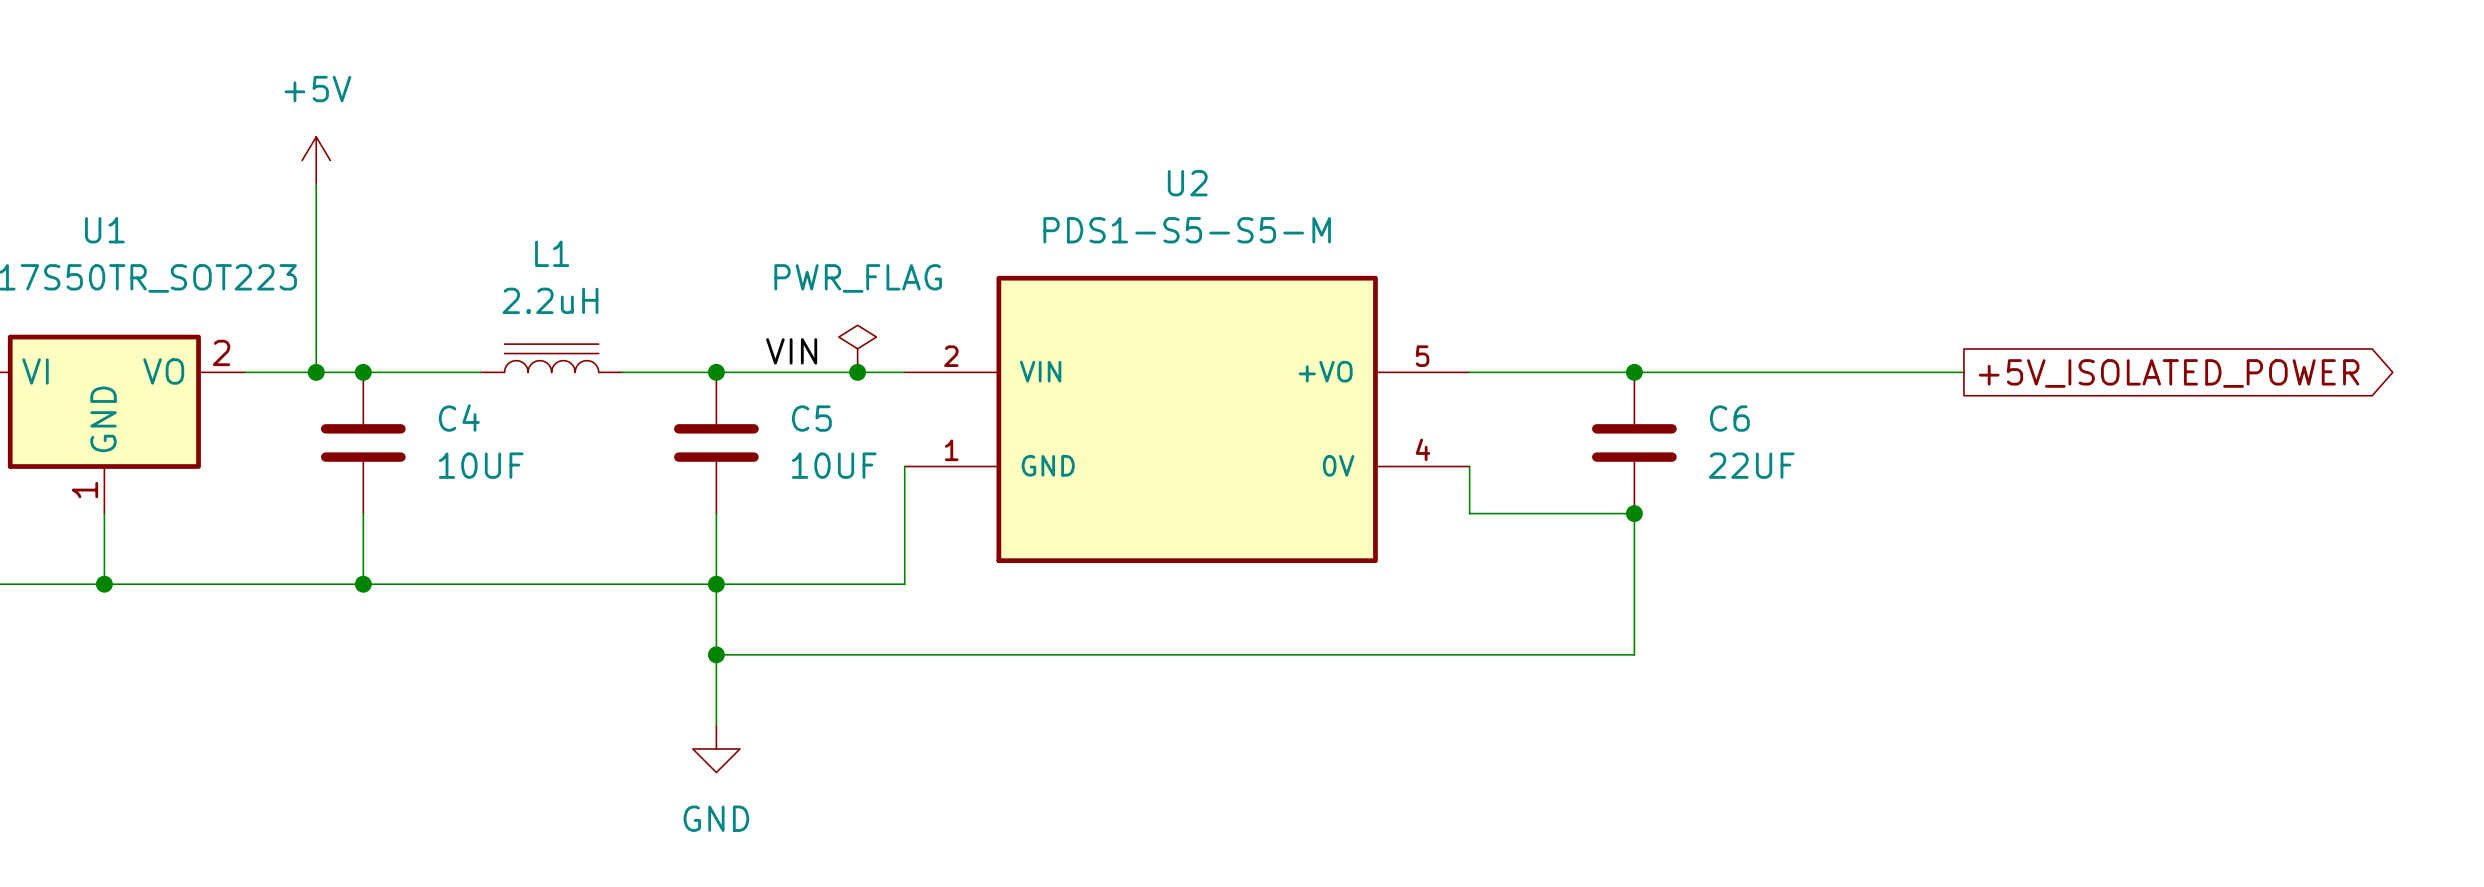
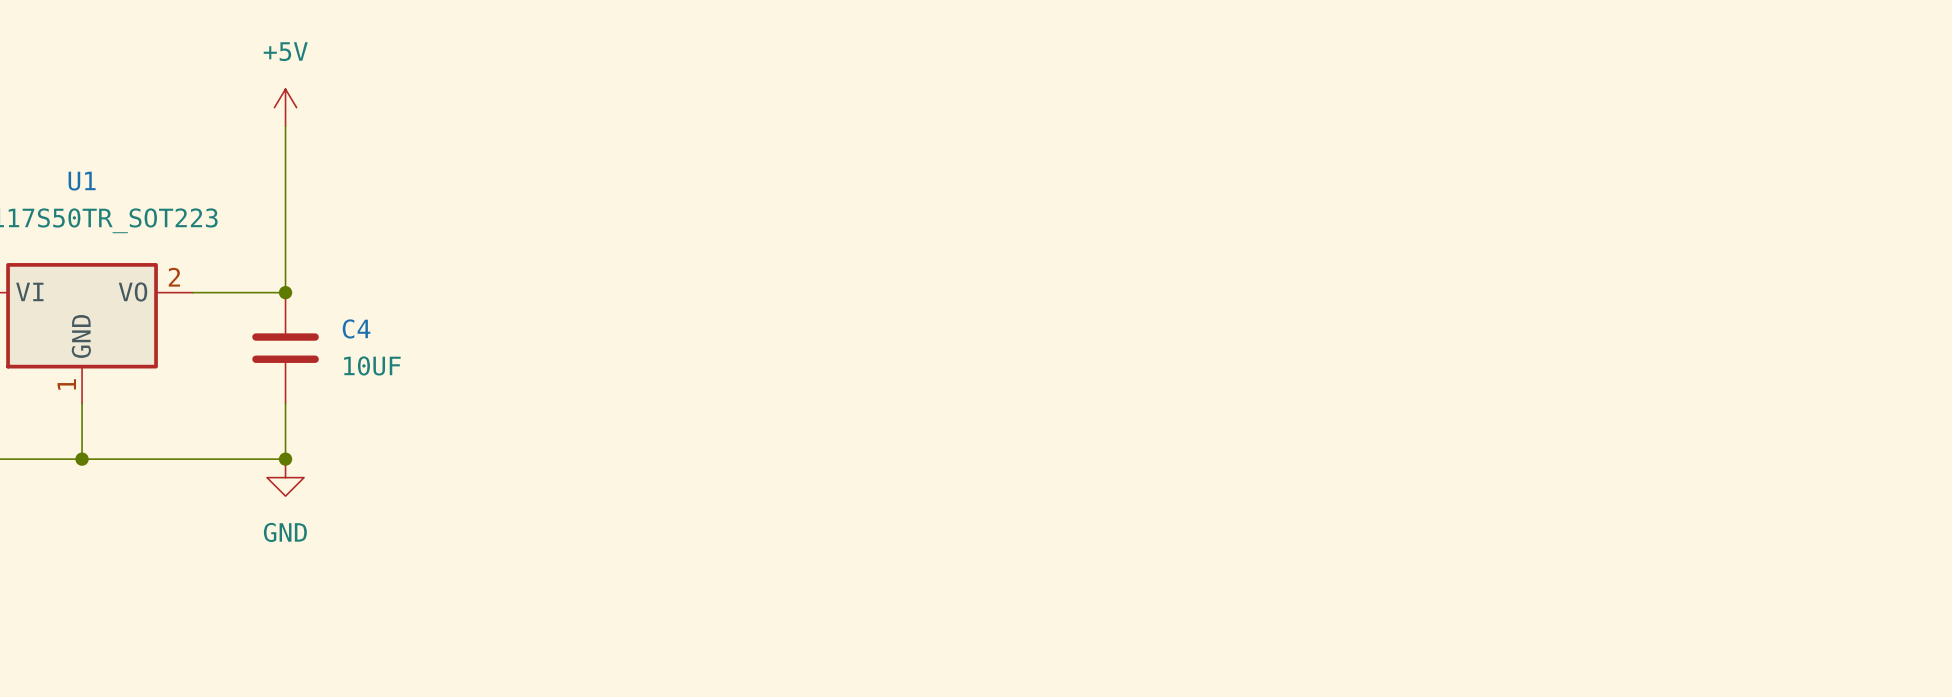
power symbol position: +5V (316, 160) -> +5V (285, 107)
wire: (316, 184) (316, 372) -> none
power symbol: PWR_FLAG (857, 348) -> none
label: VIN (791, 351) -> none
L1: 2.2uH (551, 358) -> none
junction: (316, 372) -> none
wire: (363, 372) (481, 372) -> (285, 292) (285, 126)
wire: (622, 372) (904, 372) -> none
junction: (716, 372) -> none
junction: (857, 372) -> none
wire: (1469, 372) (1963, 372) -> none
junction: (1634, 372) -> none
global label: +5V_ISOLATED_POWER (2169, 373) -> none
U2: PDS1-S5-S5-M (1187, 419) -> none
C5: 10UF (716, 442) -> none
C6: 22UF (1634, 442) -> none
wire: (904, 466) (904, 584) (363, 584) -> none
wire: (1469, 466) (1469, 513) (1634, 513) (1634, 654) (716, 654) -> none
wire: (716, 513) (716, 725) -> none
junction: (1634, 513) -> none
junction: (716, 584) -> none
junction: (716, 654) -> none
power symbol position: GND (716, 748) -> GND (285, 477)

